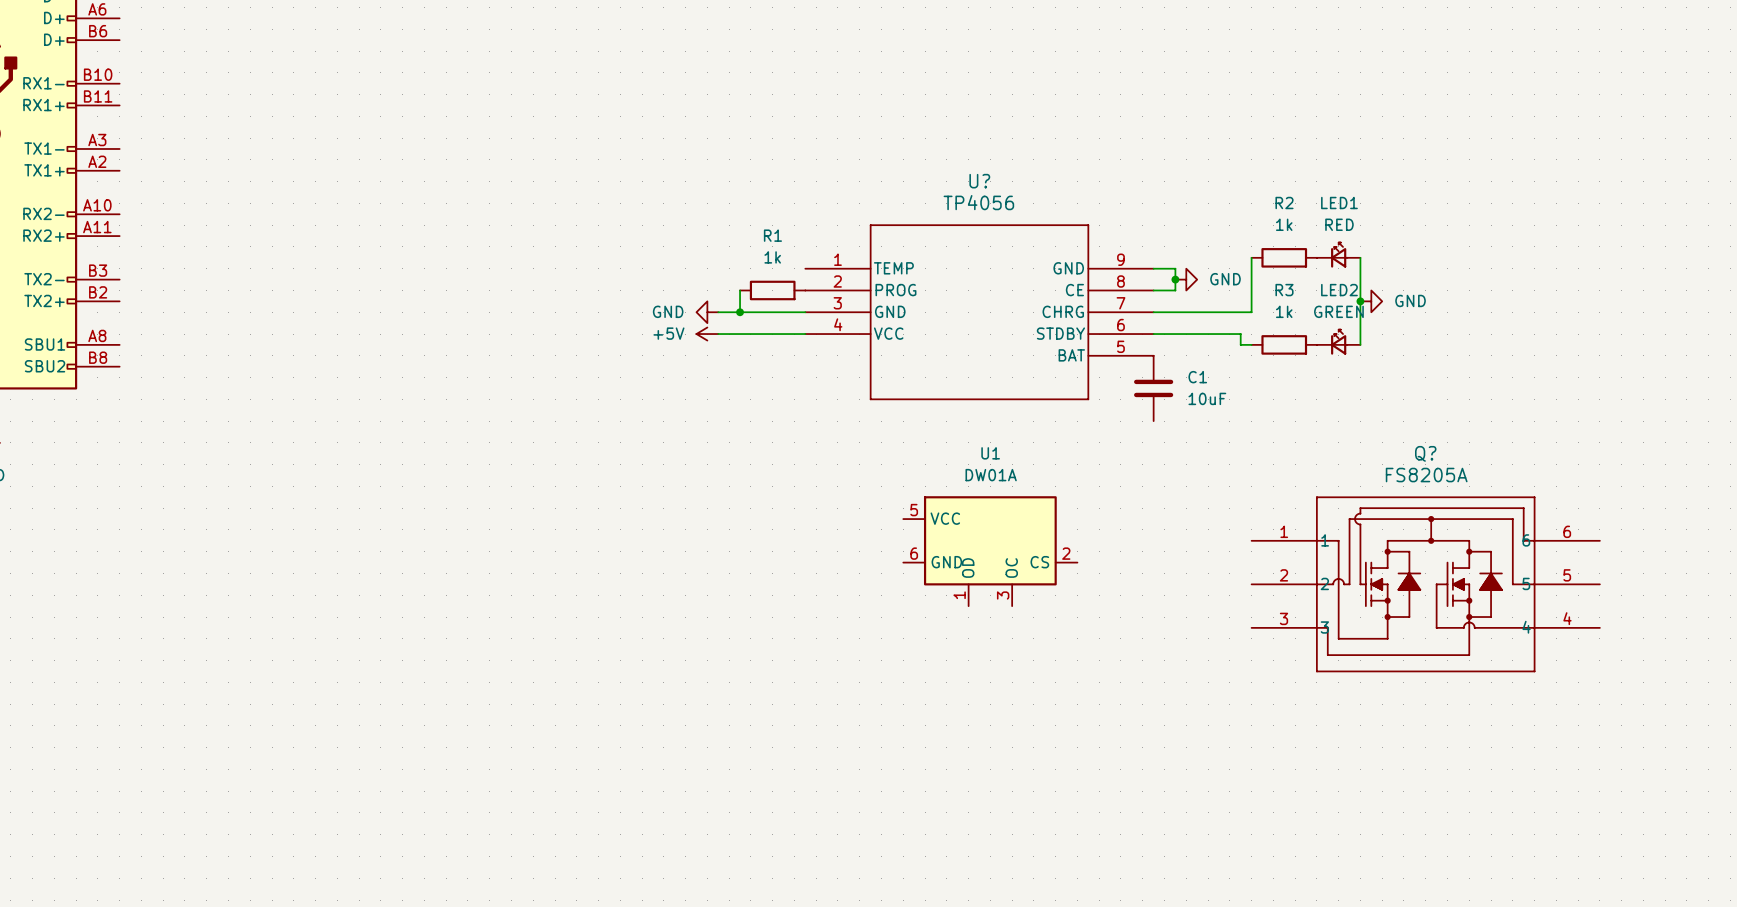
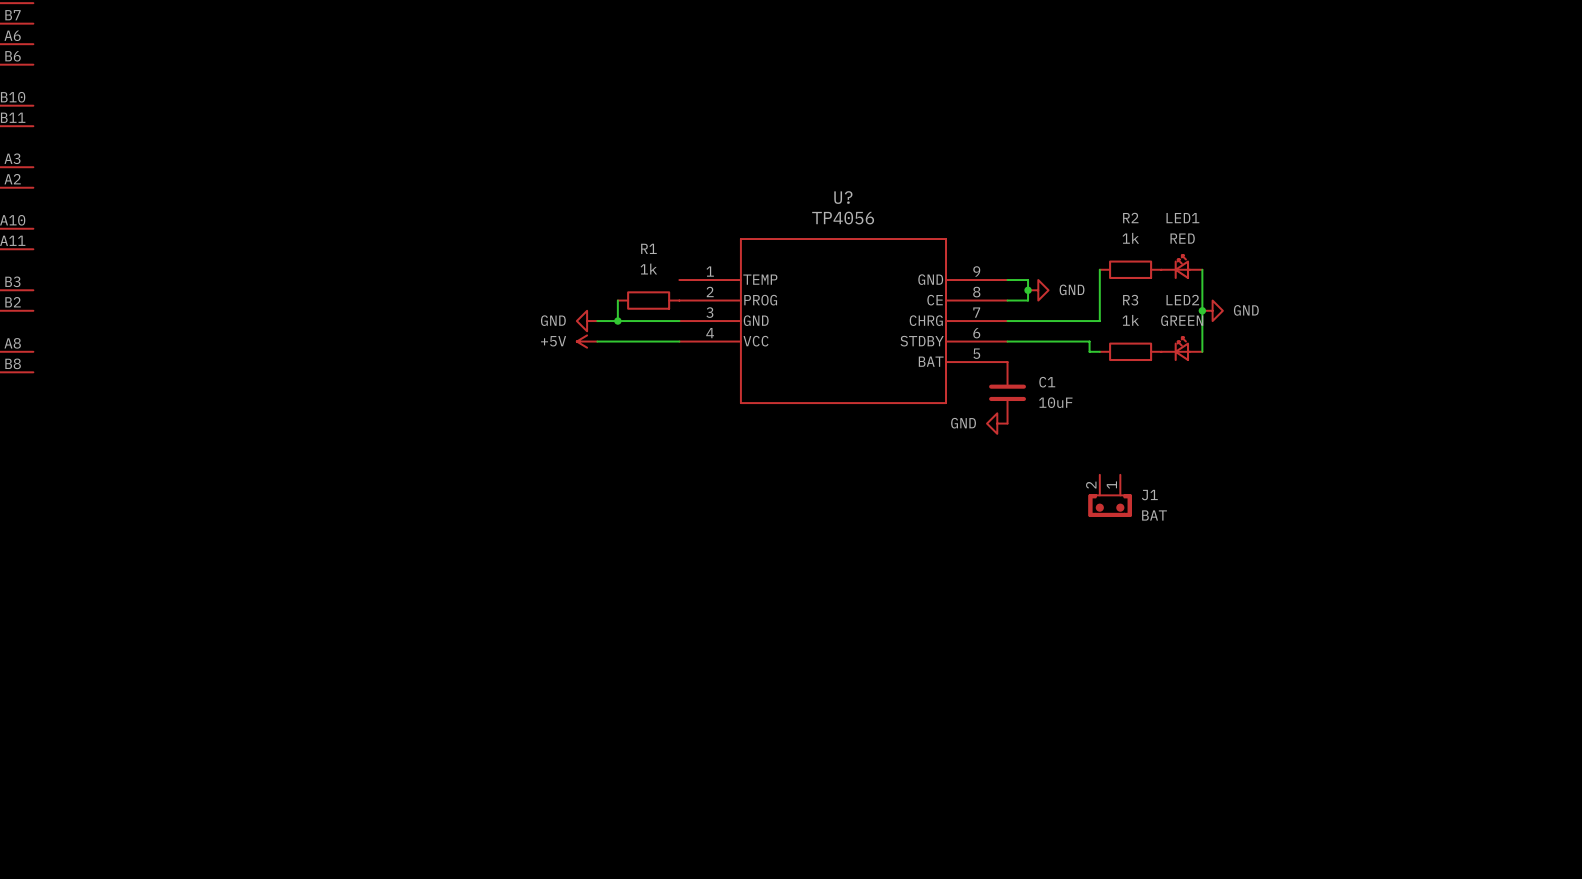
power symbol: none -> GND (997, 423)
J1: none -> BAT (1110, 495)
U1: DW01A (990, 551) -> none
Q?: FS8205A (1425, 584) -> none

